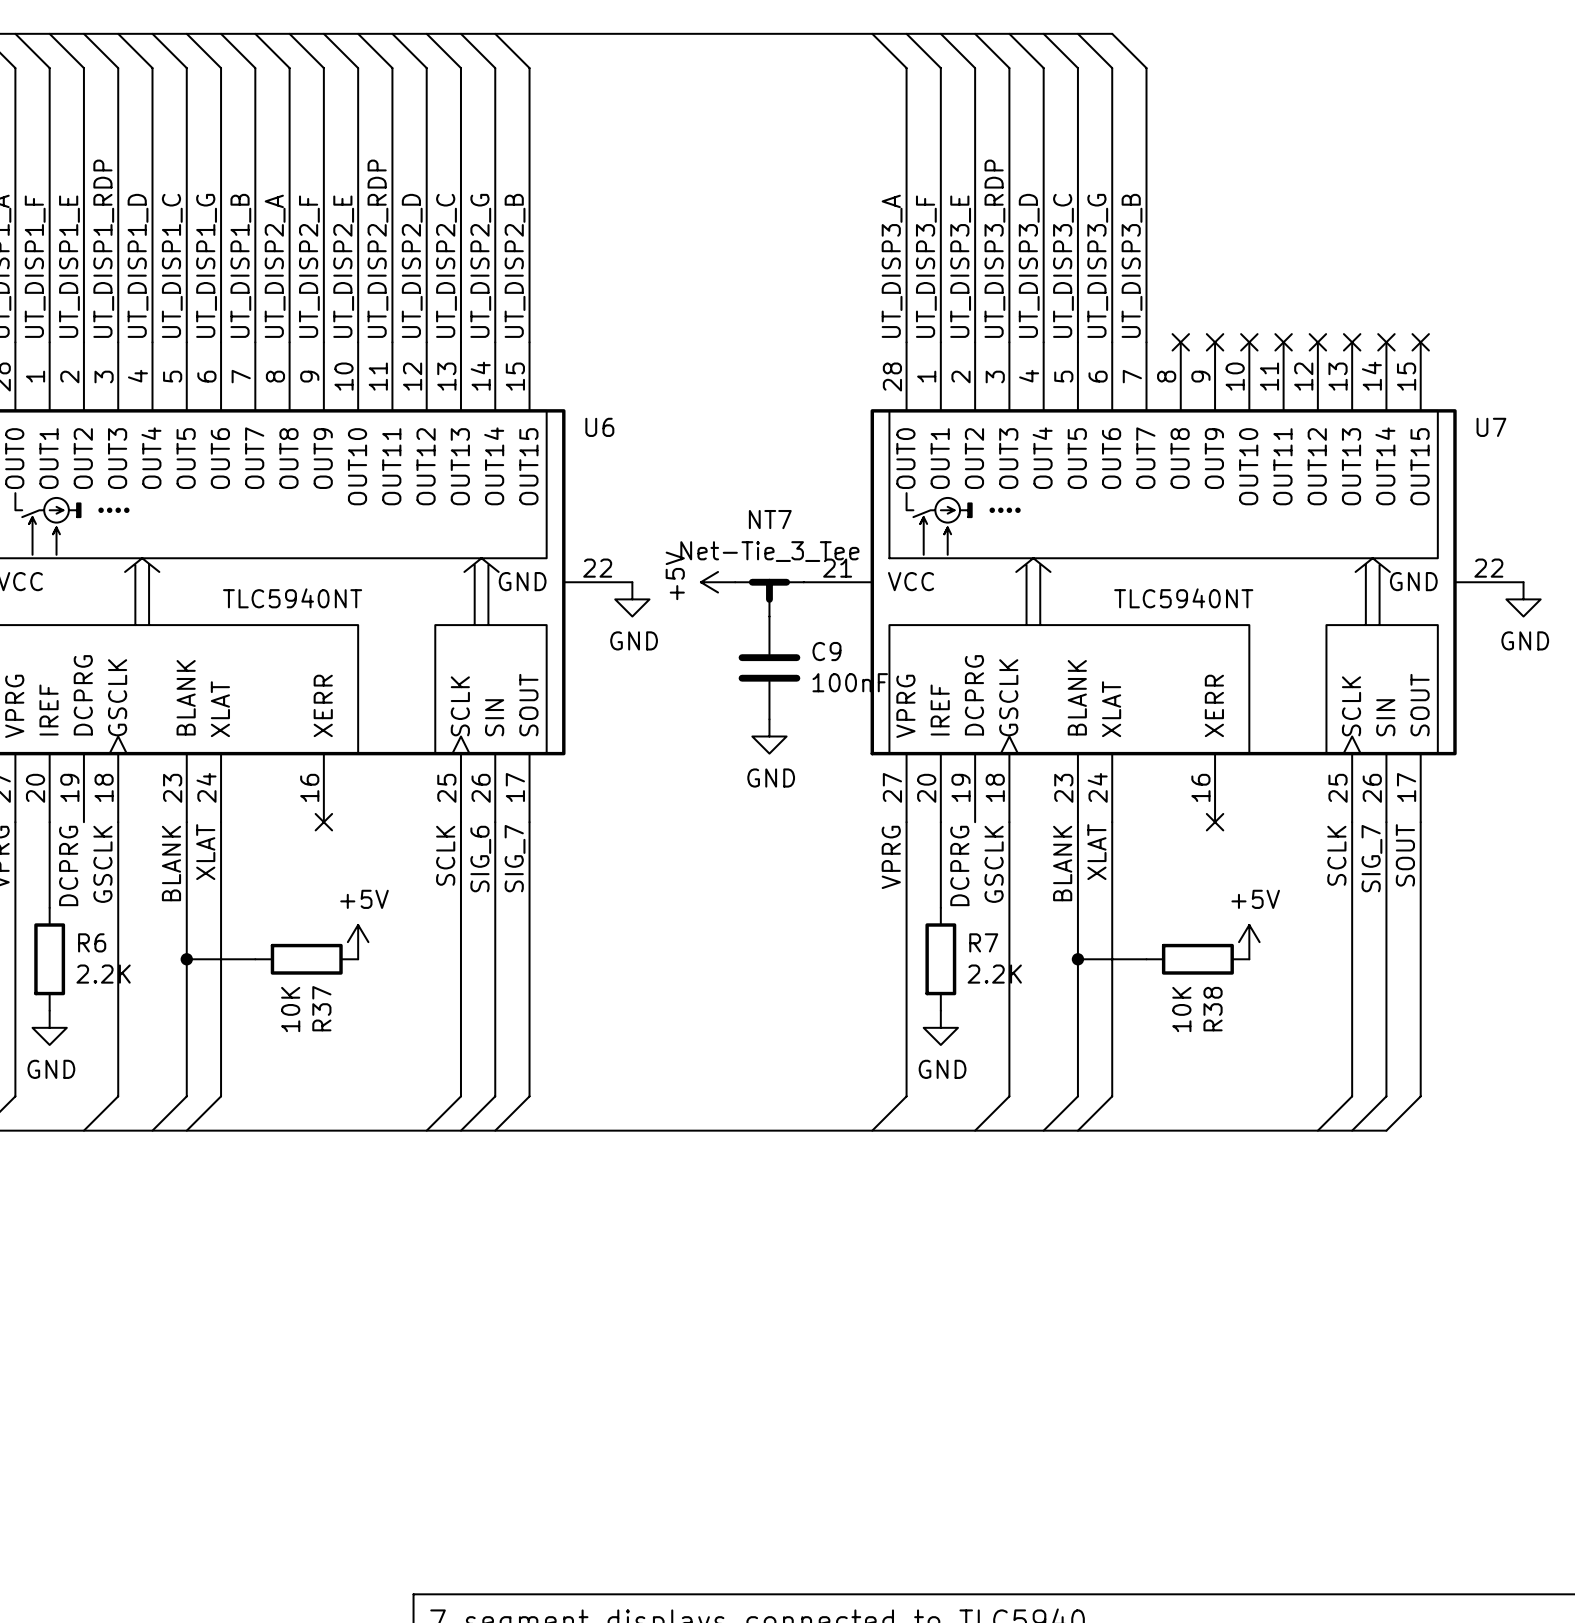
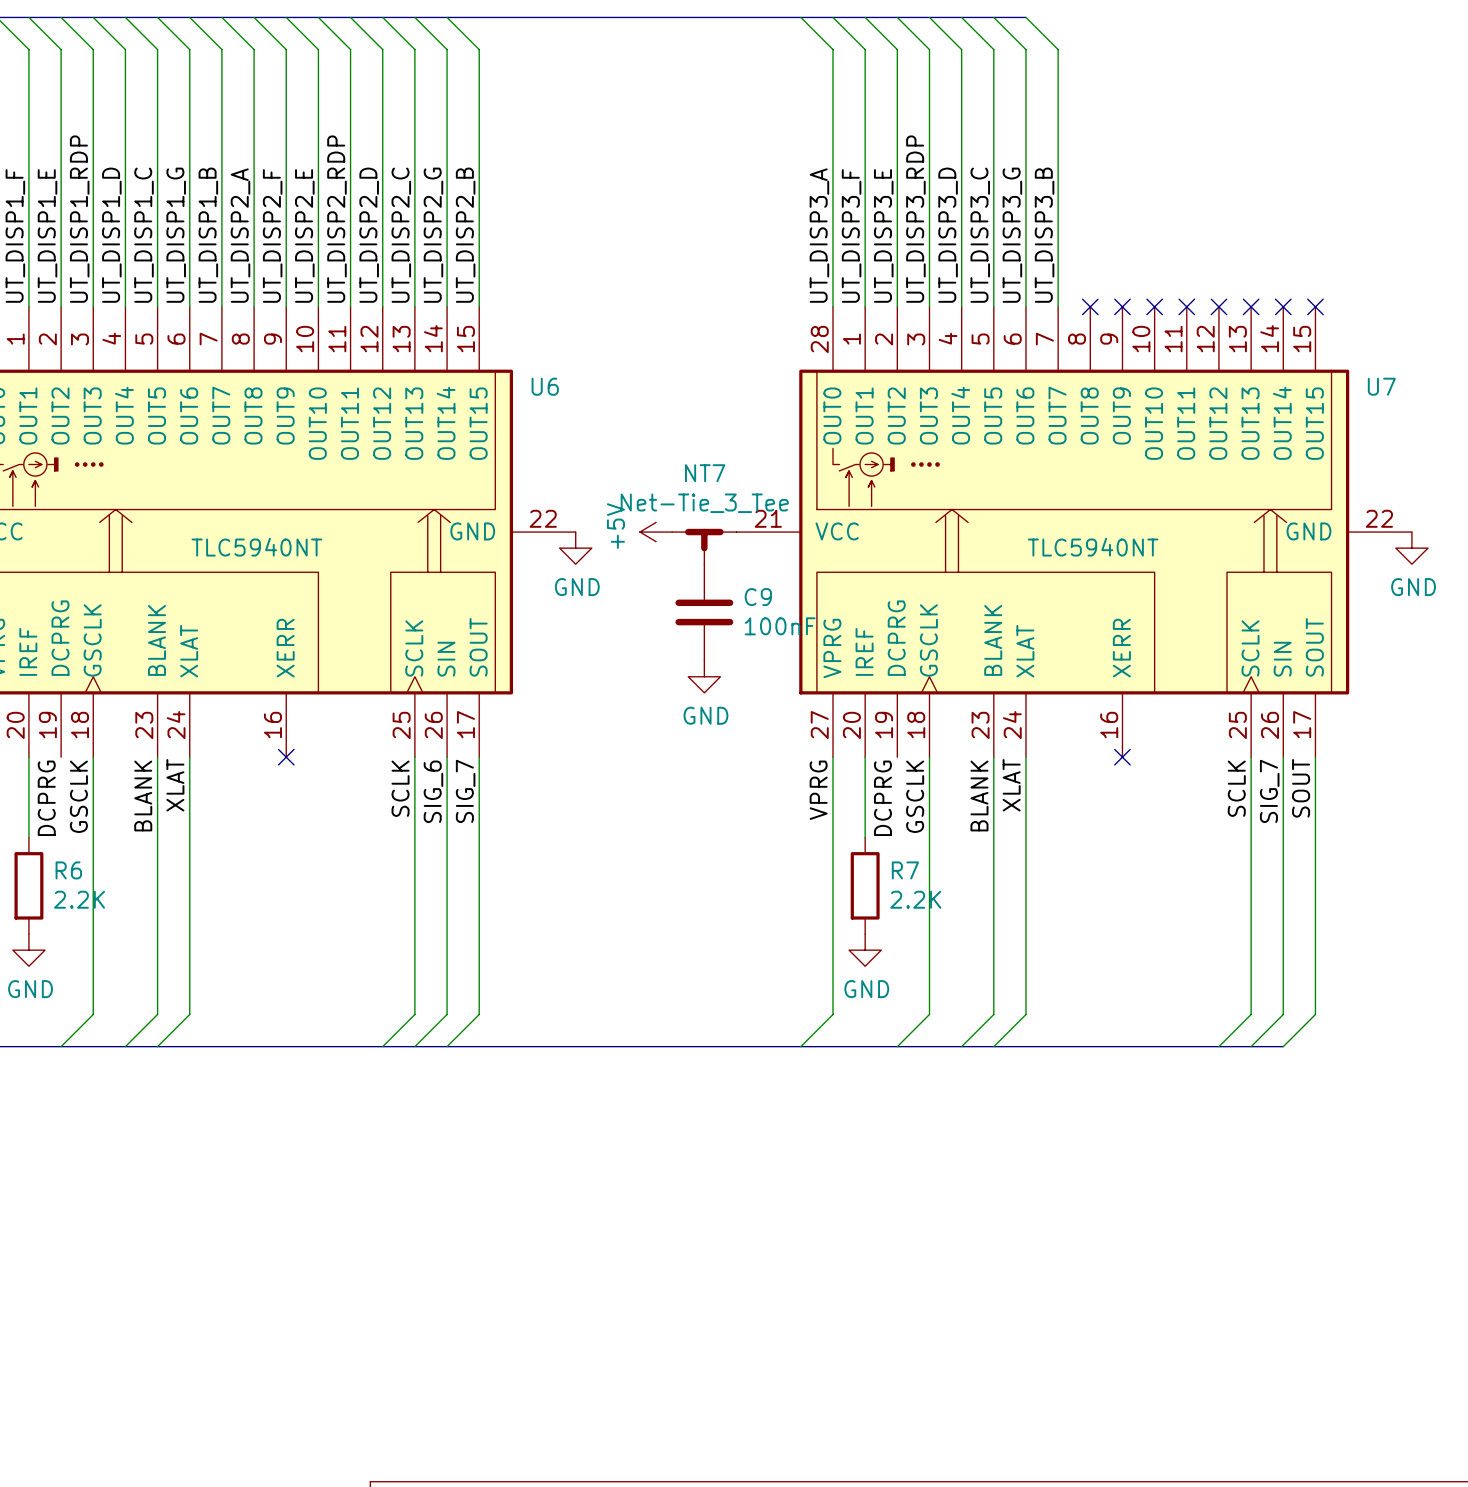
power symbol: +5V (358, 942) -> none
power symbol: +5V (1249, 942) -> none
wire: (186, 959) (255, 959) -> none
junction: (186, 959) -> none
R37: 10K (306, 959) -> none
wire: (1077, 959) (1146, 959) -> none
junction: (1077, 959) -> none
R38: 10K (1197, 959) -> none

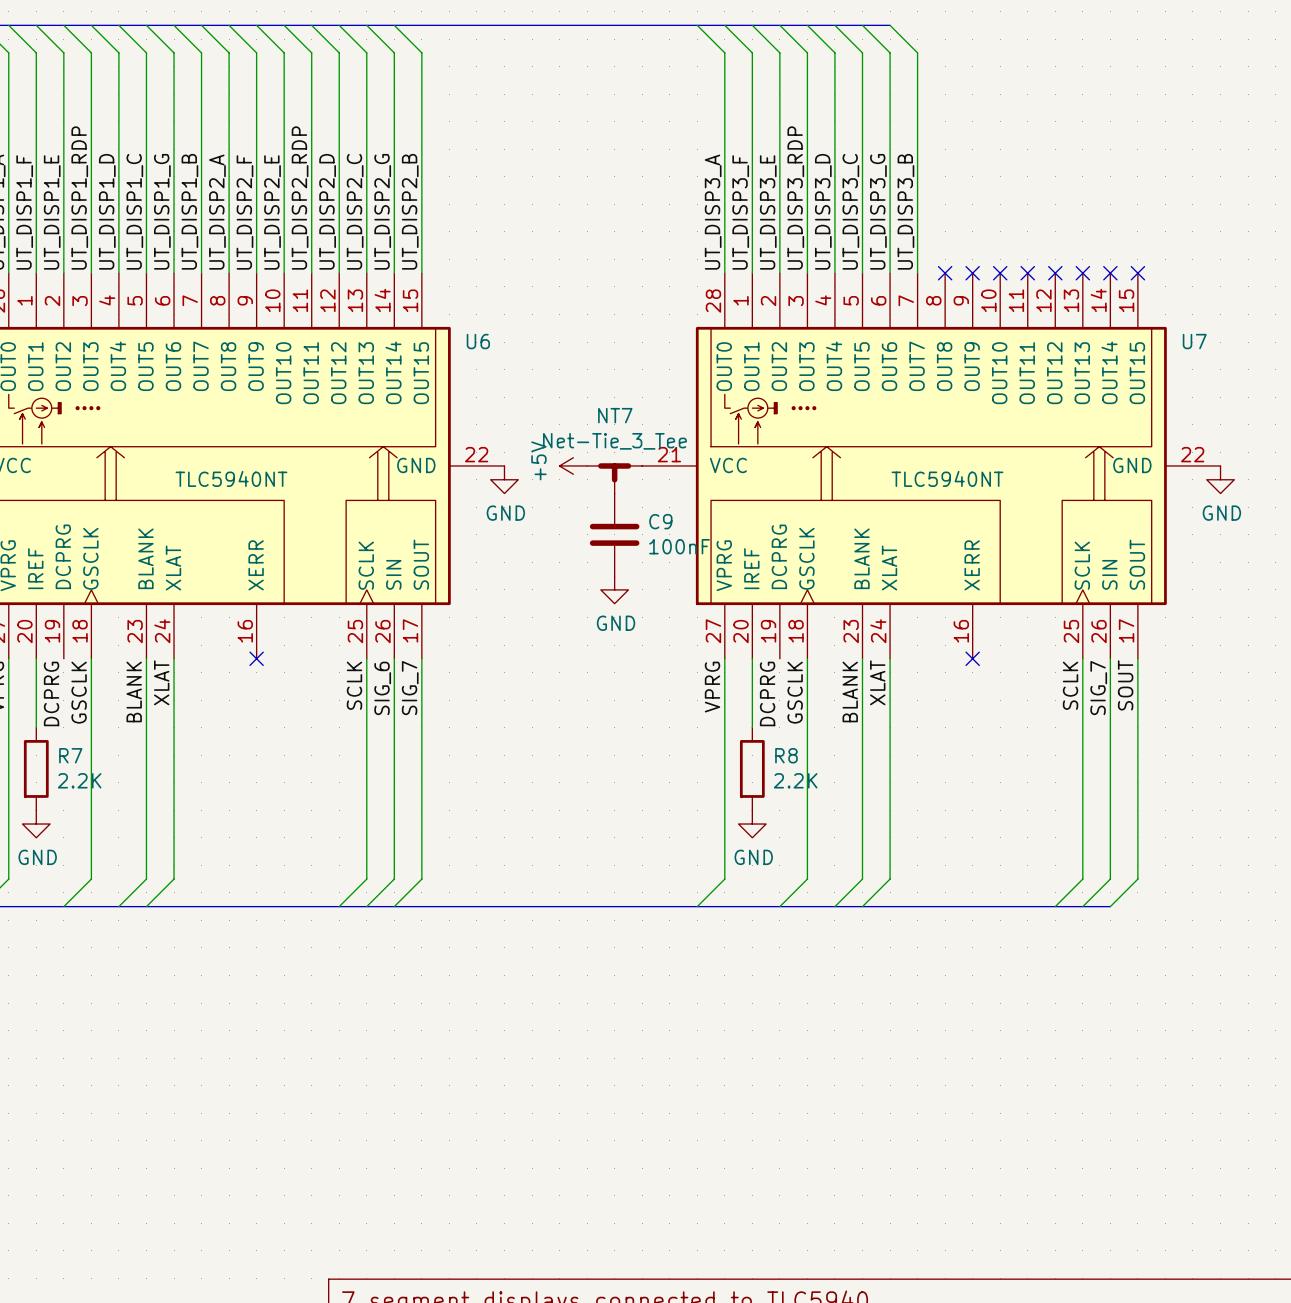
R6 name: R6 (68, 870) -> R7 (70, 755)
R7 name: R7 (905, 870) -> R8 (786, 755)

